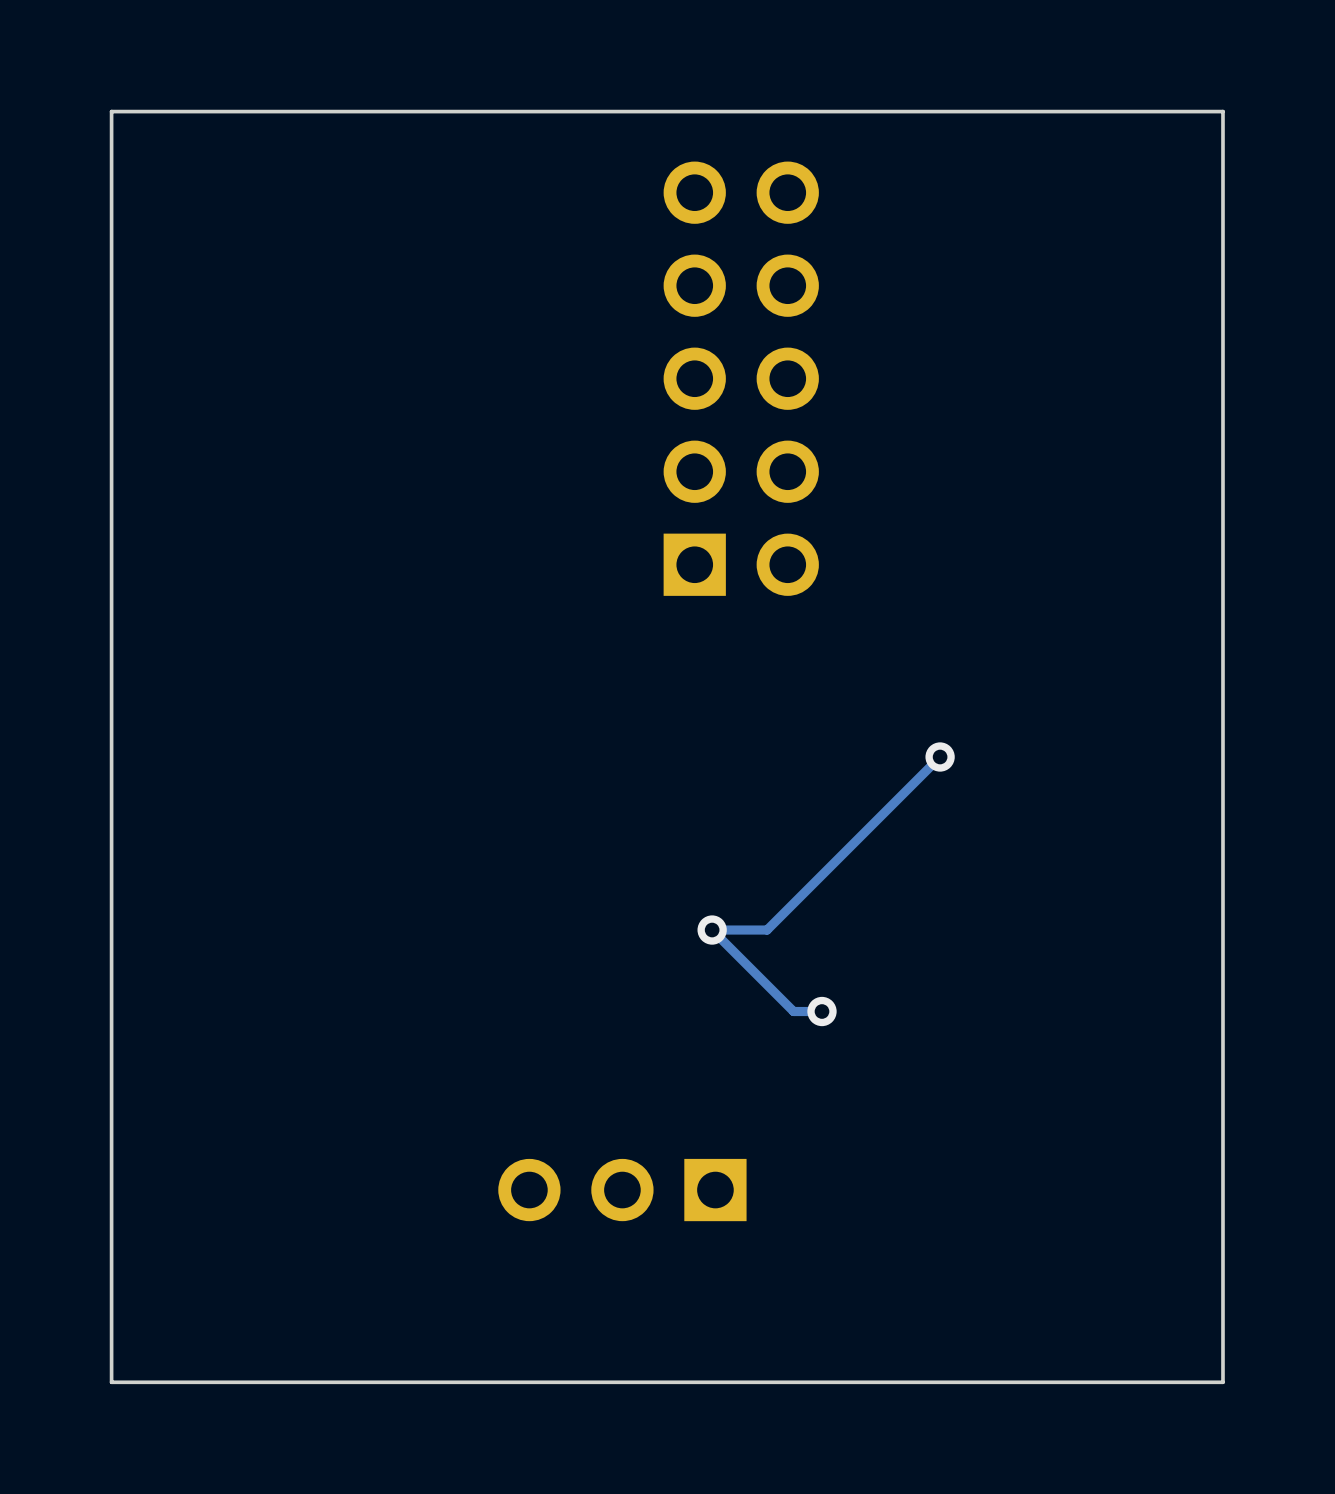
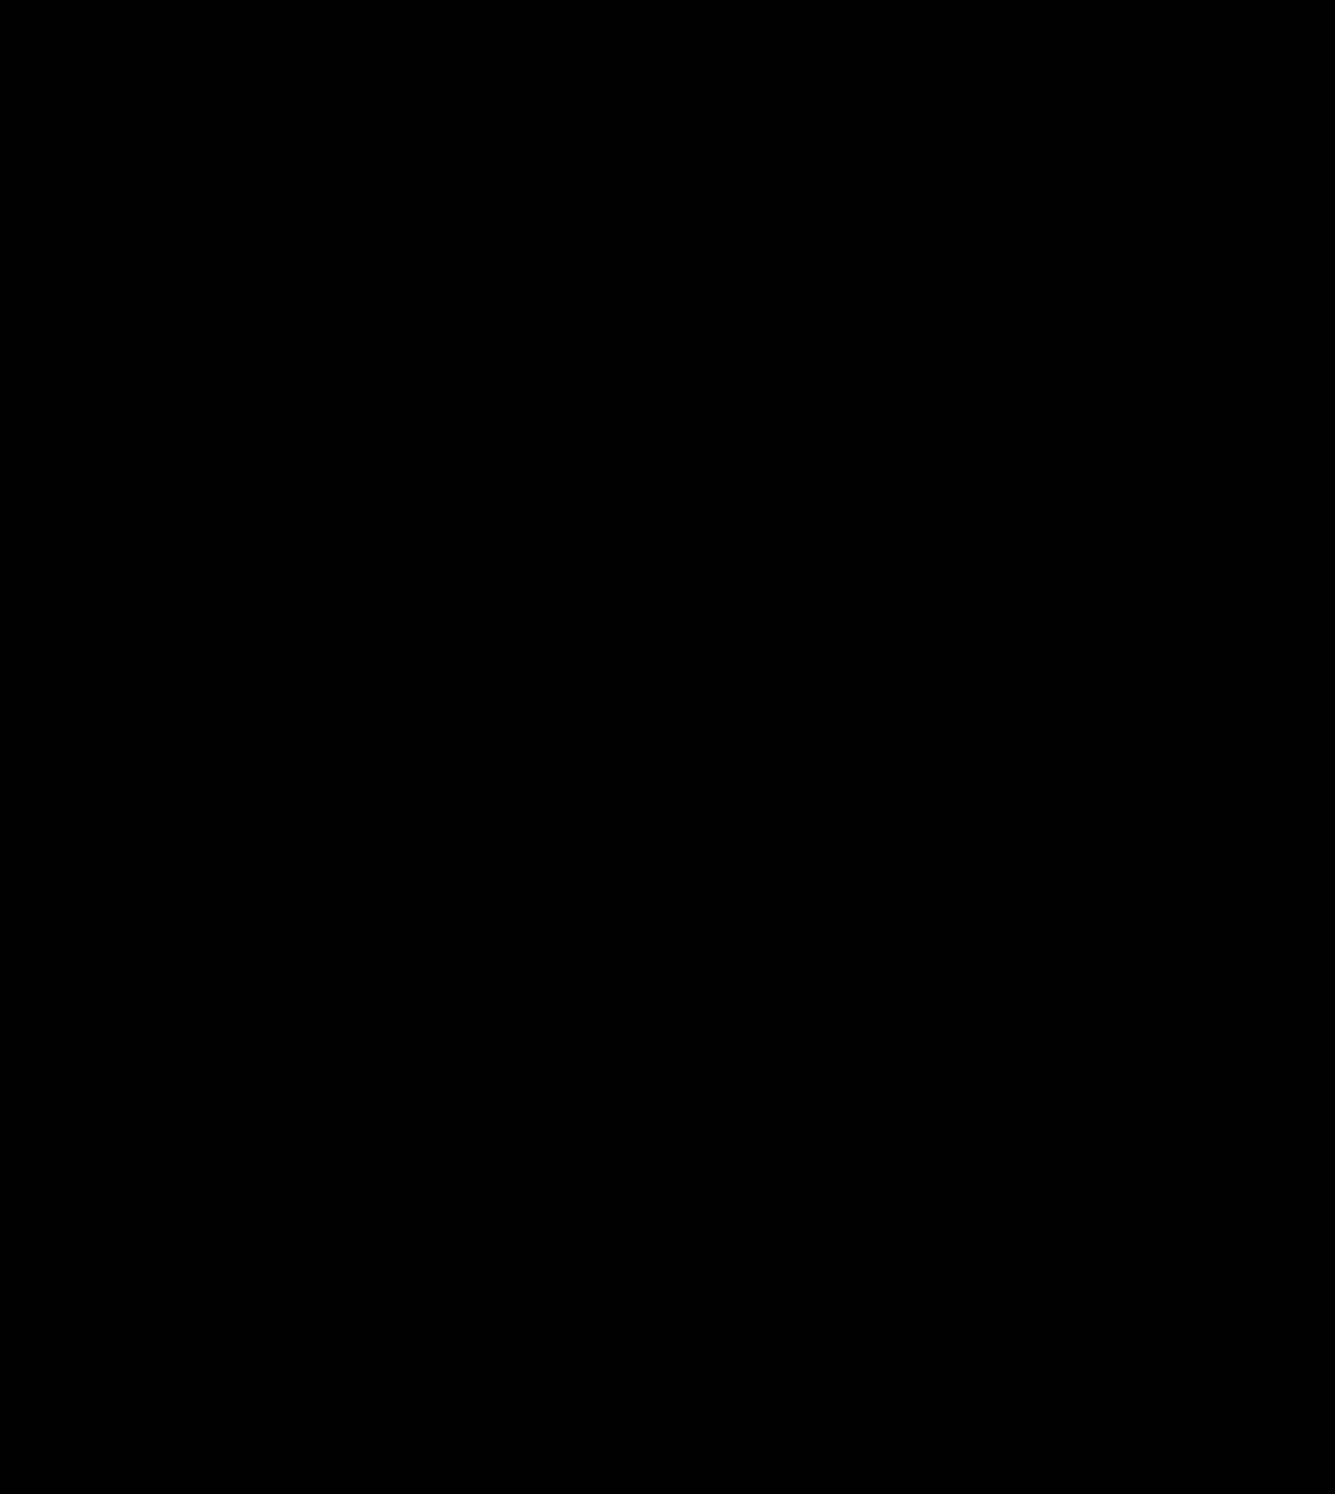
board edge: (1222, 111) (111, 111) (111, 1382) (1222, 1382) (1222, 111) -> none
part: (741, 378) -> none
track: (940, 757) (767, 930) (712, 930) (793, 1011) (822, 1011) -> none
via: (940, 757) -> none
via: (712, 930) -> none
via: (822, 1011) -> none
part: (622, 1190) -> none

